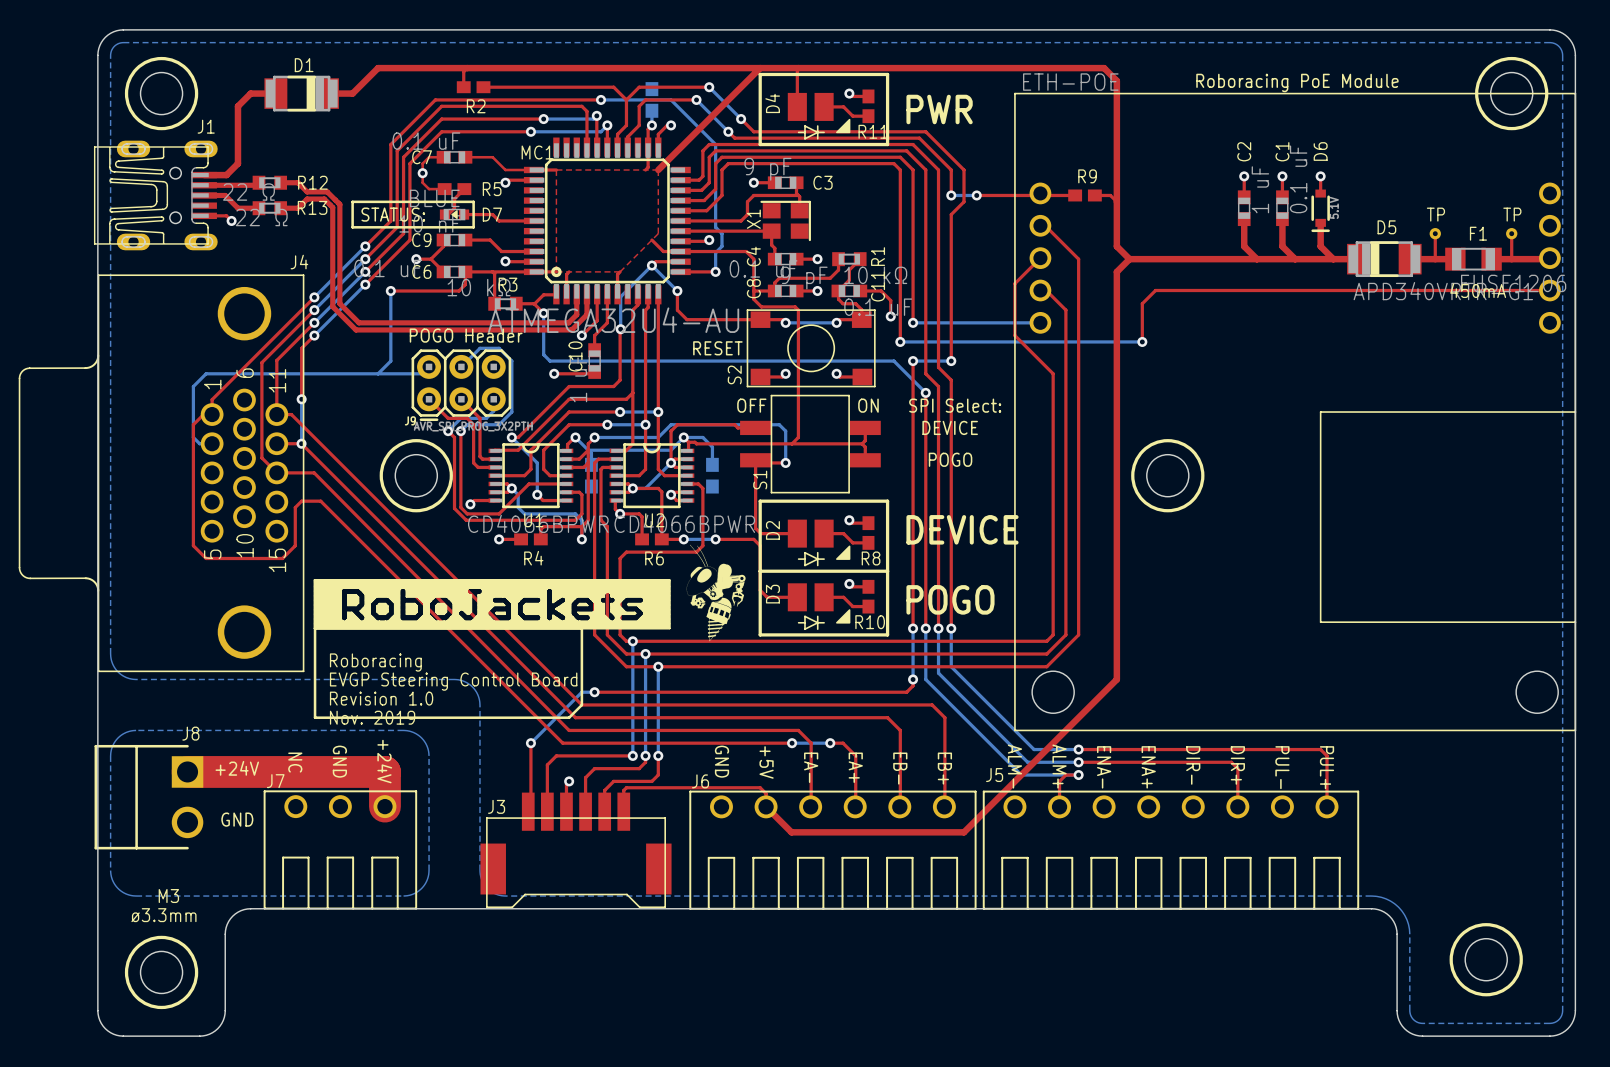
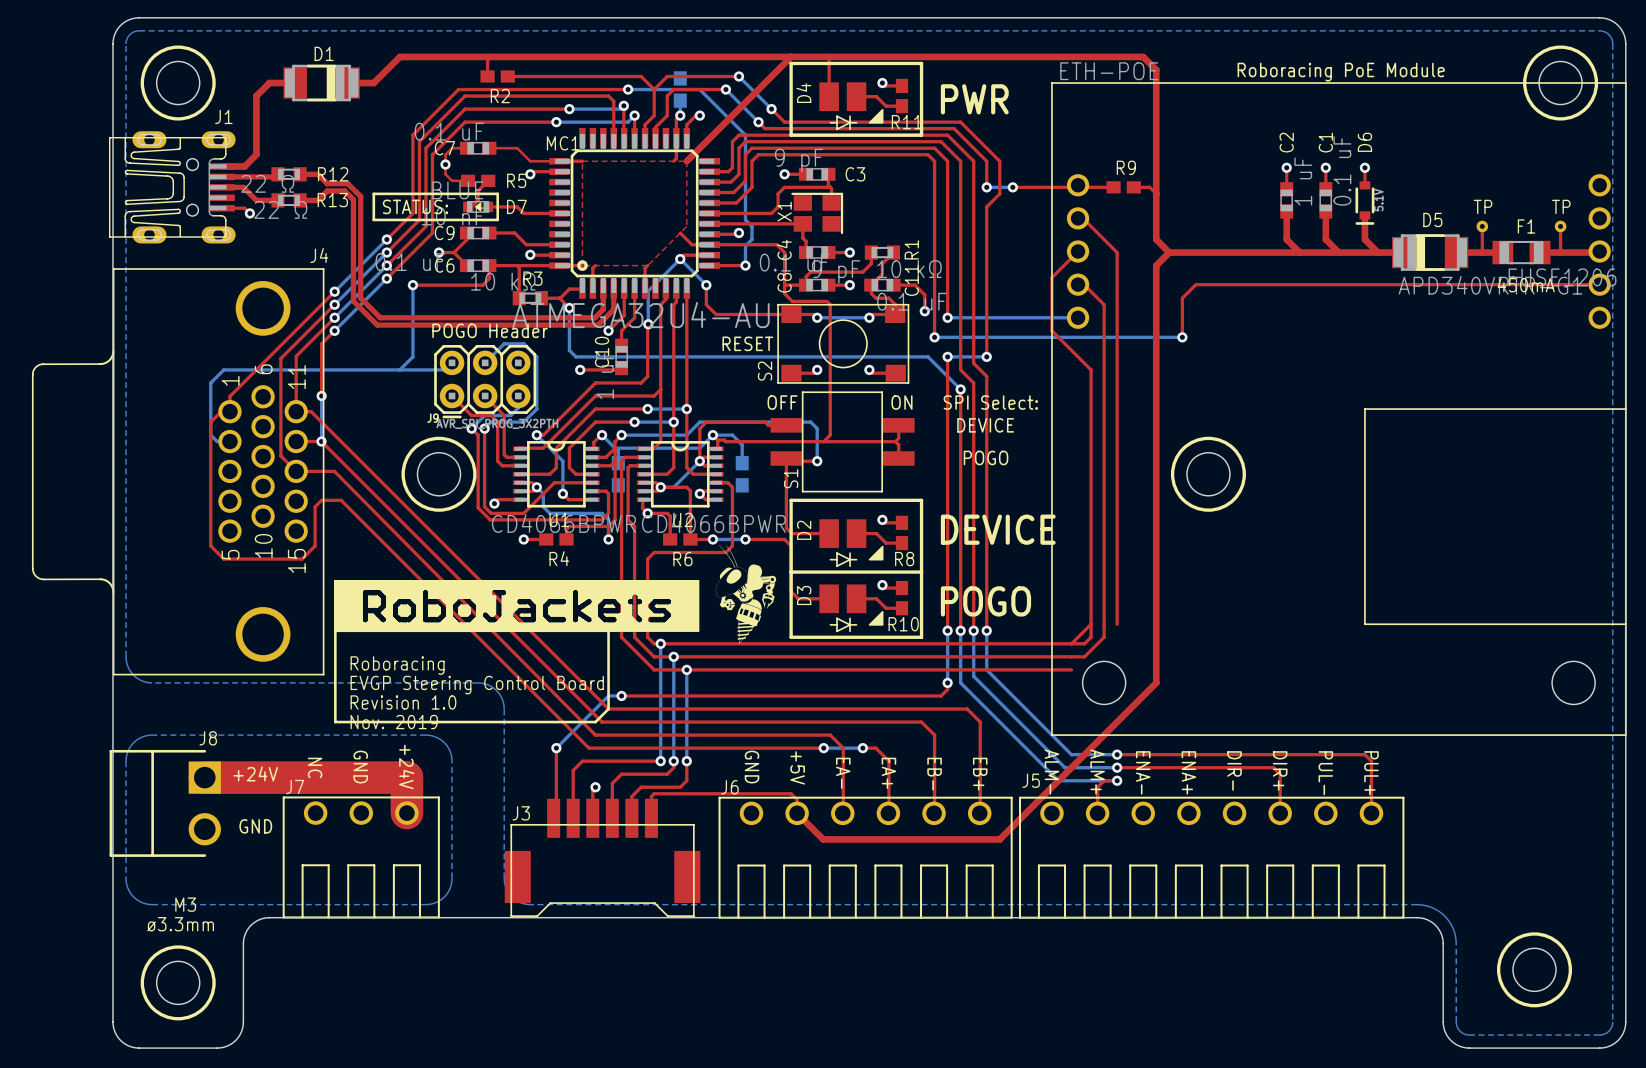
part footprint: [1014, 92, 1577, 732] -> [1051, 82, 1627, 736]
top track: none -> (1091, 624) (1071, 643)
top track: (1078, 622) (1078, 634) (1046, 666) (1034, 666) -> none

